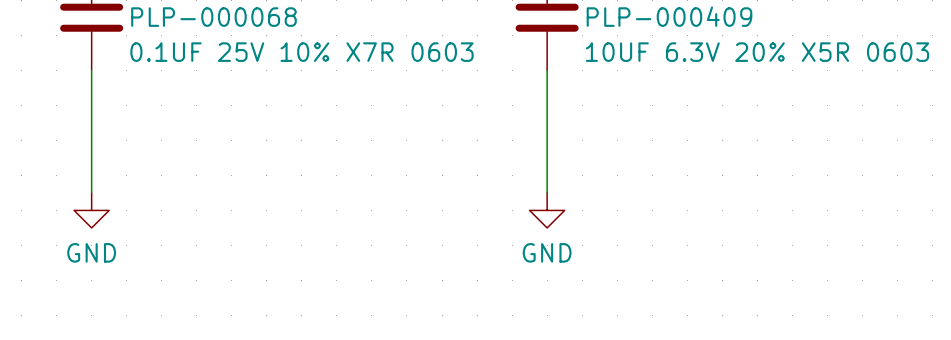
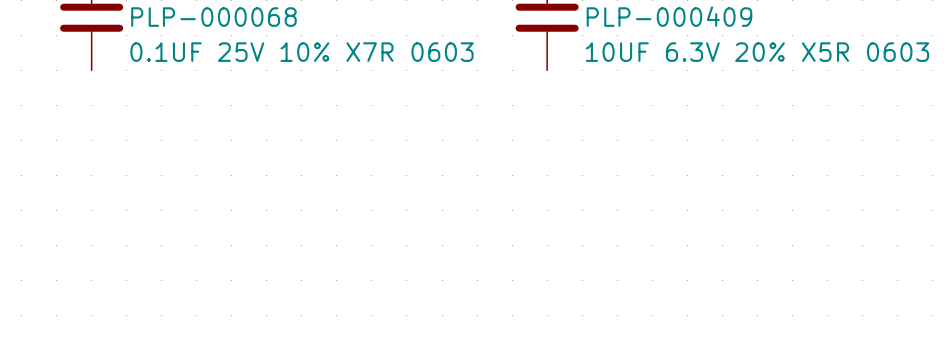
wire: (91, 70) (91, 192) -> none
wire: (547, 70) (547, 192) -> none
power symbol: GND (91, 210) -> none
power symbol: GND (547, 210) -> none

